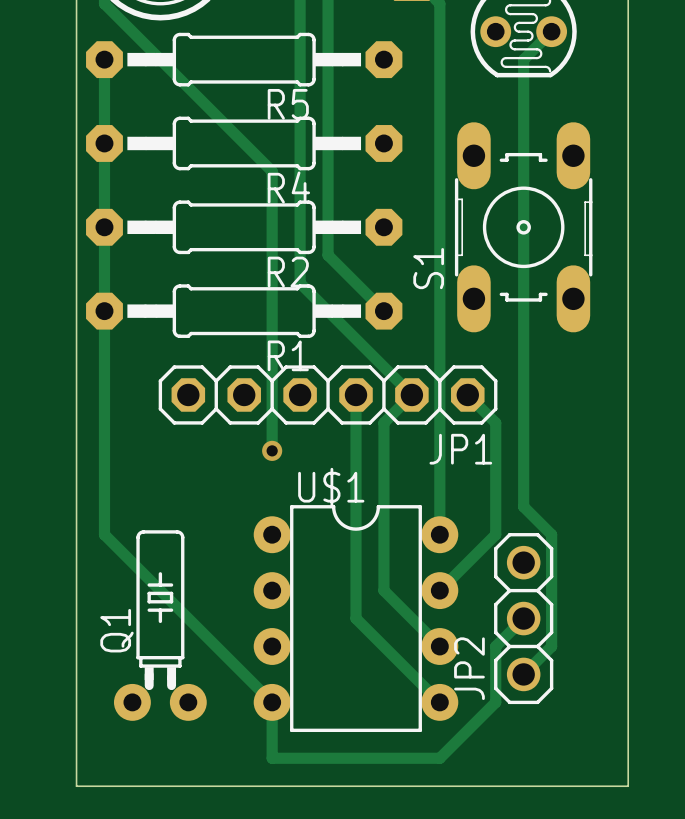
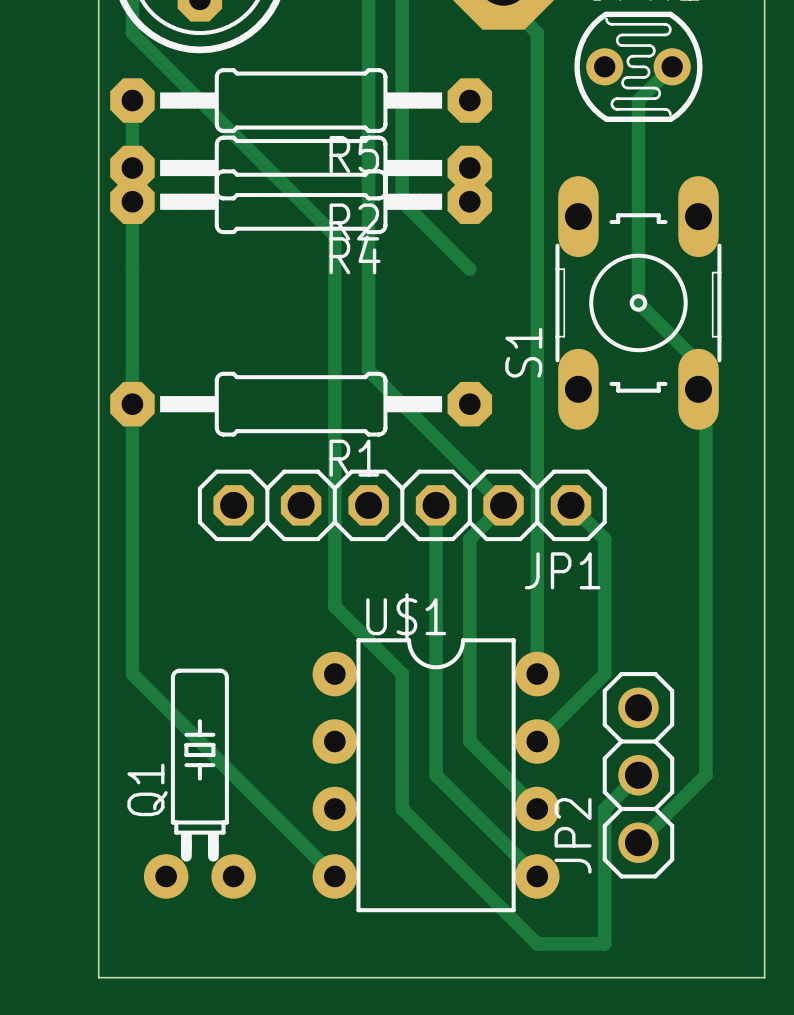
track: (328, 143) (328, 255) (383, 311) -> (402, 201) (469, 269)
R2 position: (244, 227) -> (301, 168)
track: (523, 227) (523, 506) (551, 534) (551, 646) -> (638, 302) (705, 370) (698, 389) (705, 404) (705, 775) (672, 808)
via: (272, 450) -> none
track: (272, 702) (272, 758) (439, 758) (495, 702) -> (334, 572) (334, 606) (402, 674) (402, 808) (537, 943) (604, 943) (604, 876)

